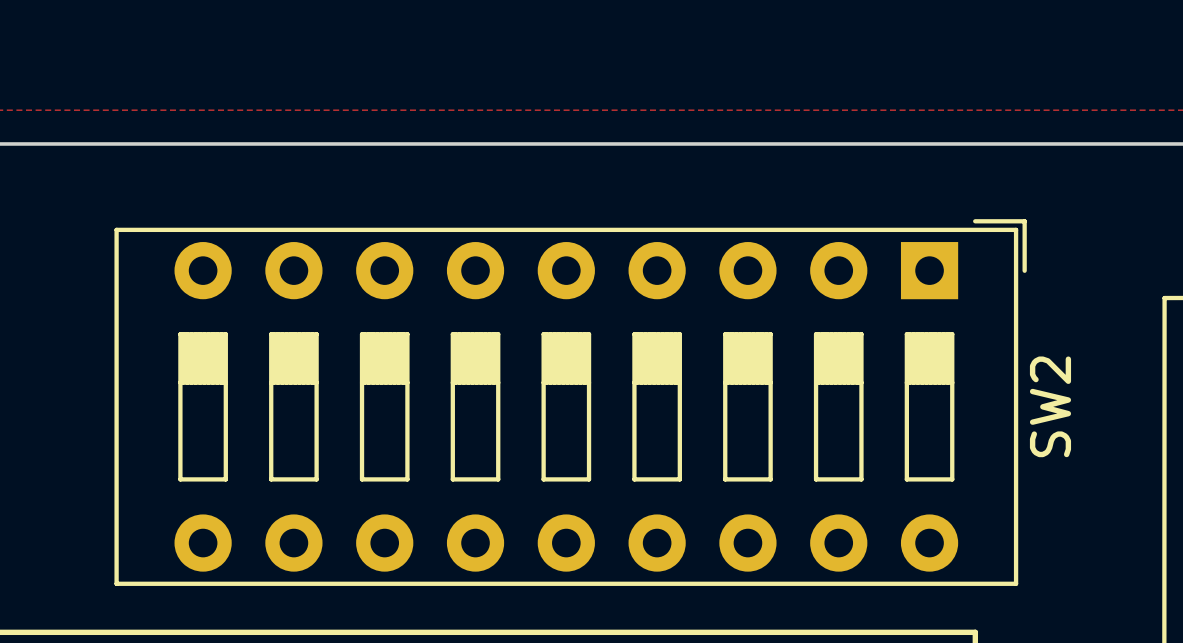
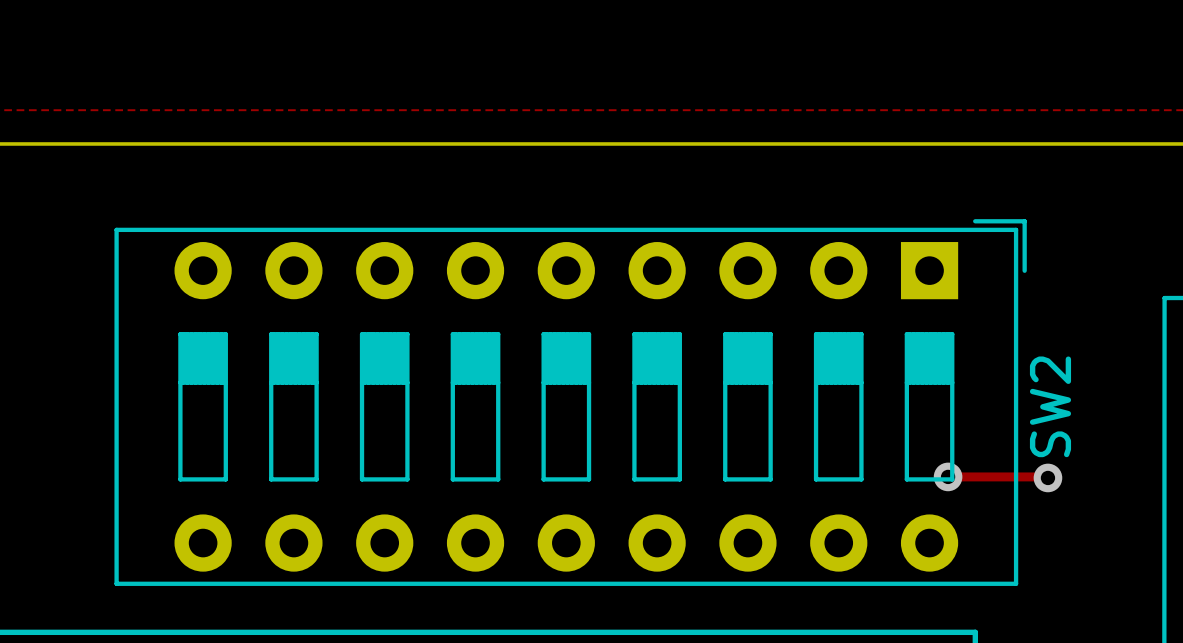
track: none -> (948, 476) (1047, 477)
via: none -> (948, 476)
via: none -> (1047, 477)

